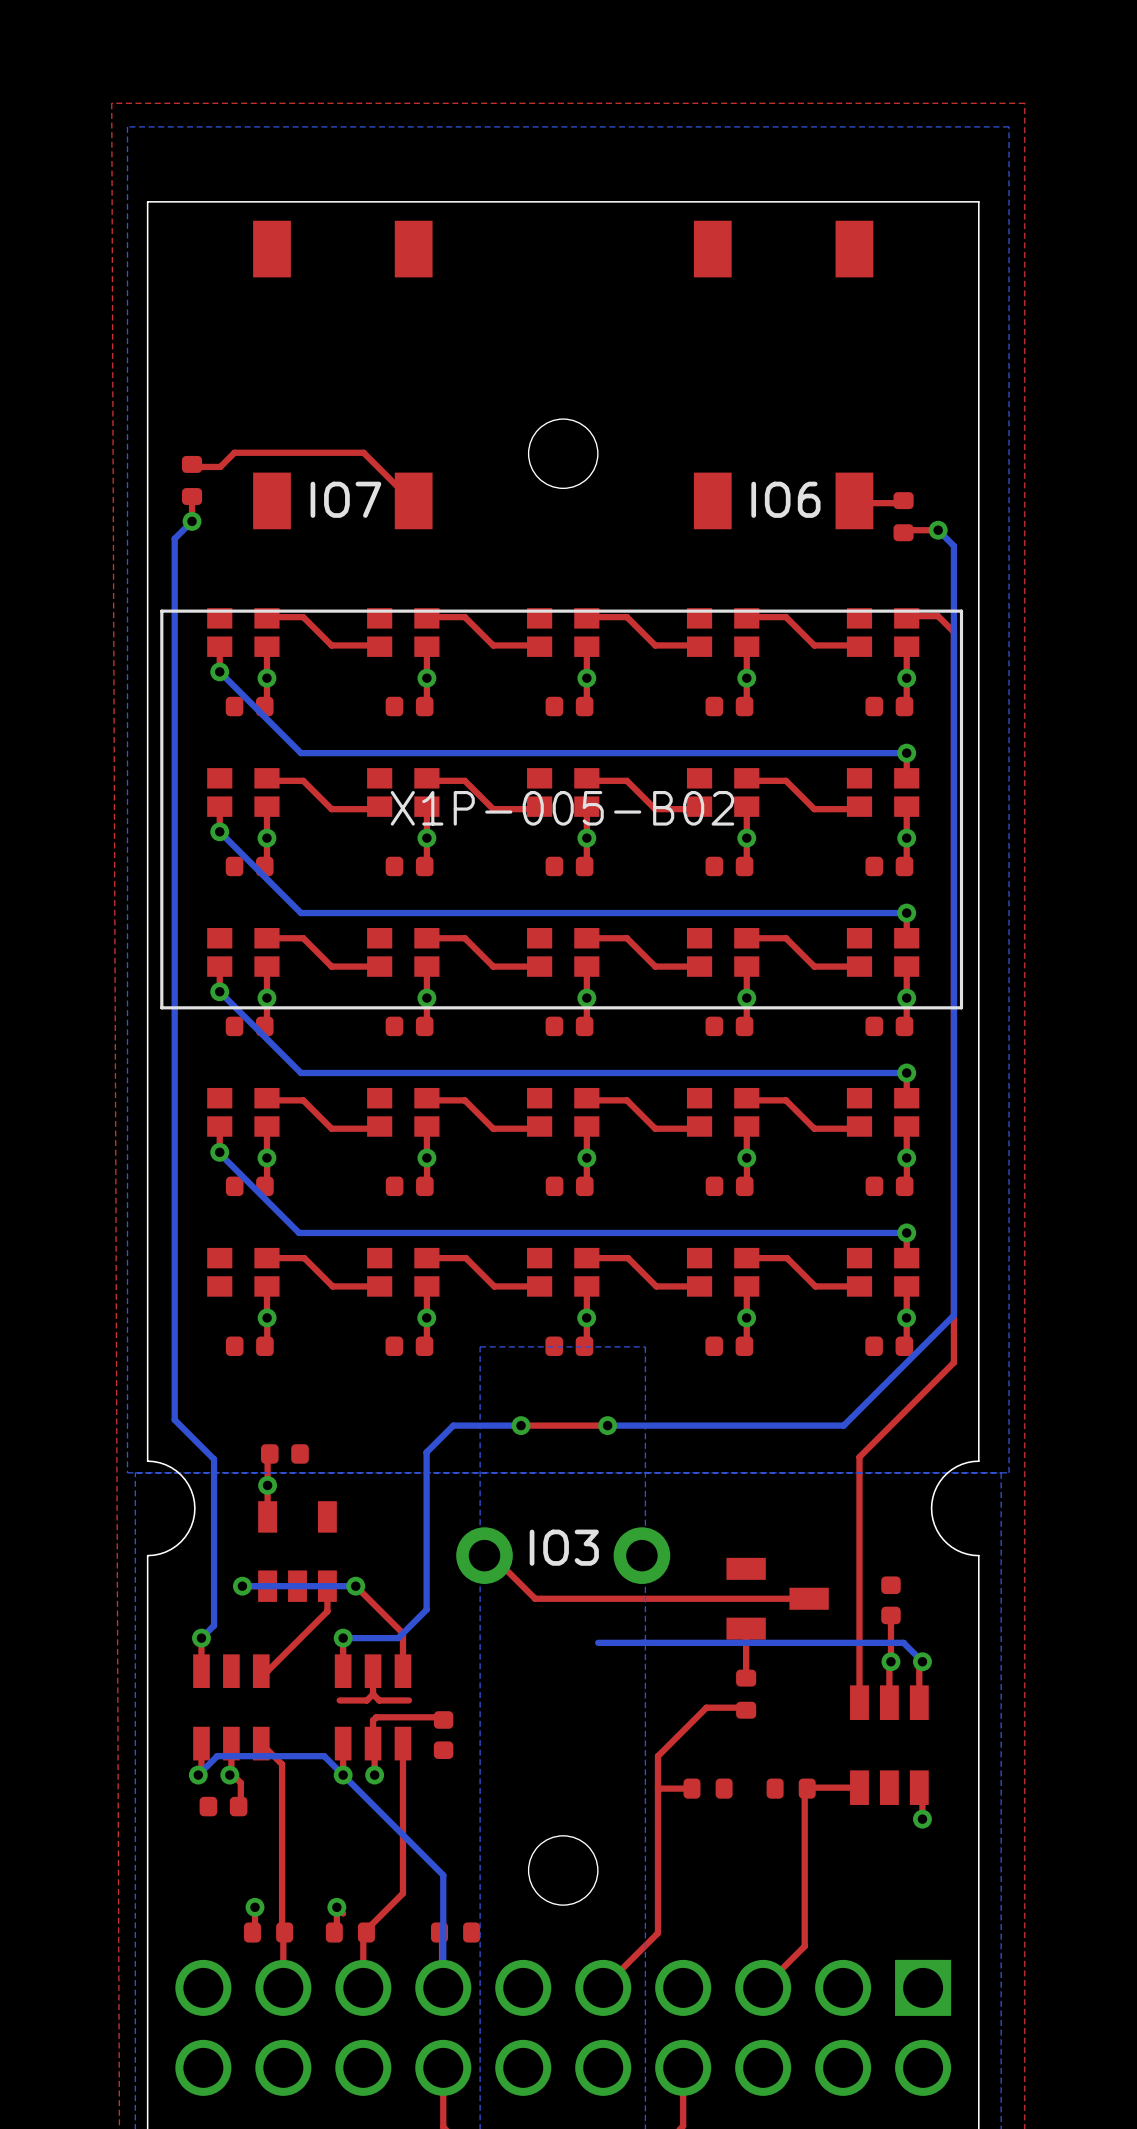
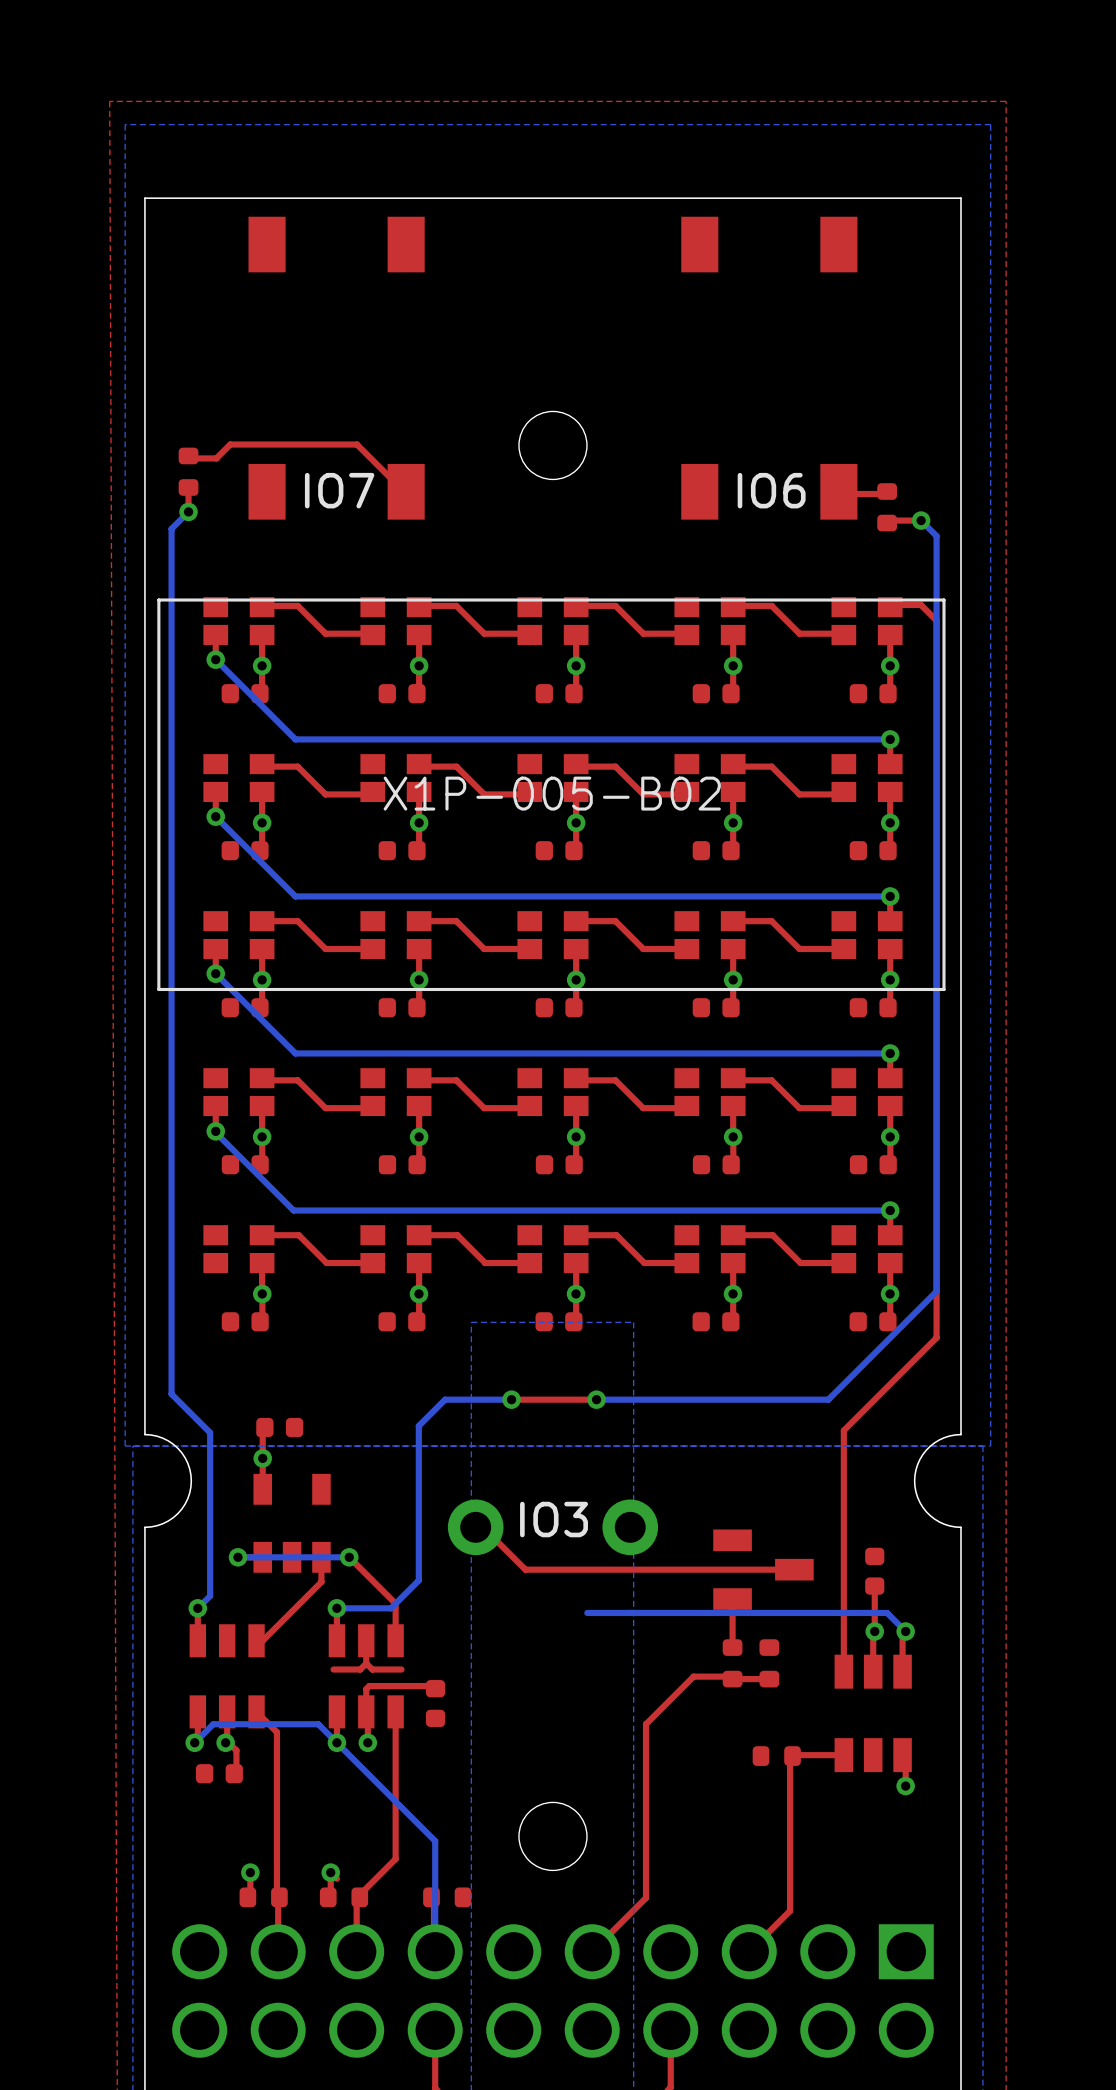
top track: none -> (769, 1679) (732, 1679)
top track: (691, 1788) (657, 1788) -> none
part rotation: 0° (708, 1788) -> 90° clockwise (769, 1663)
part position: (708, 1788) -> (769, 1663)

